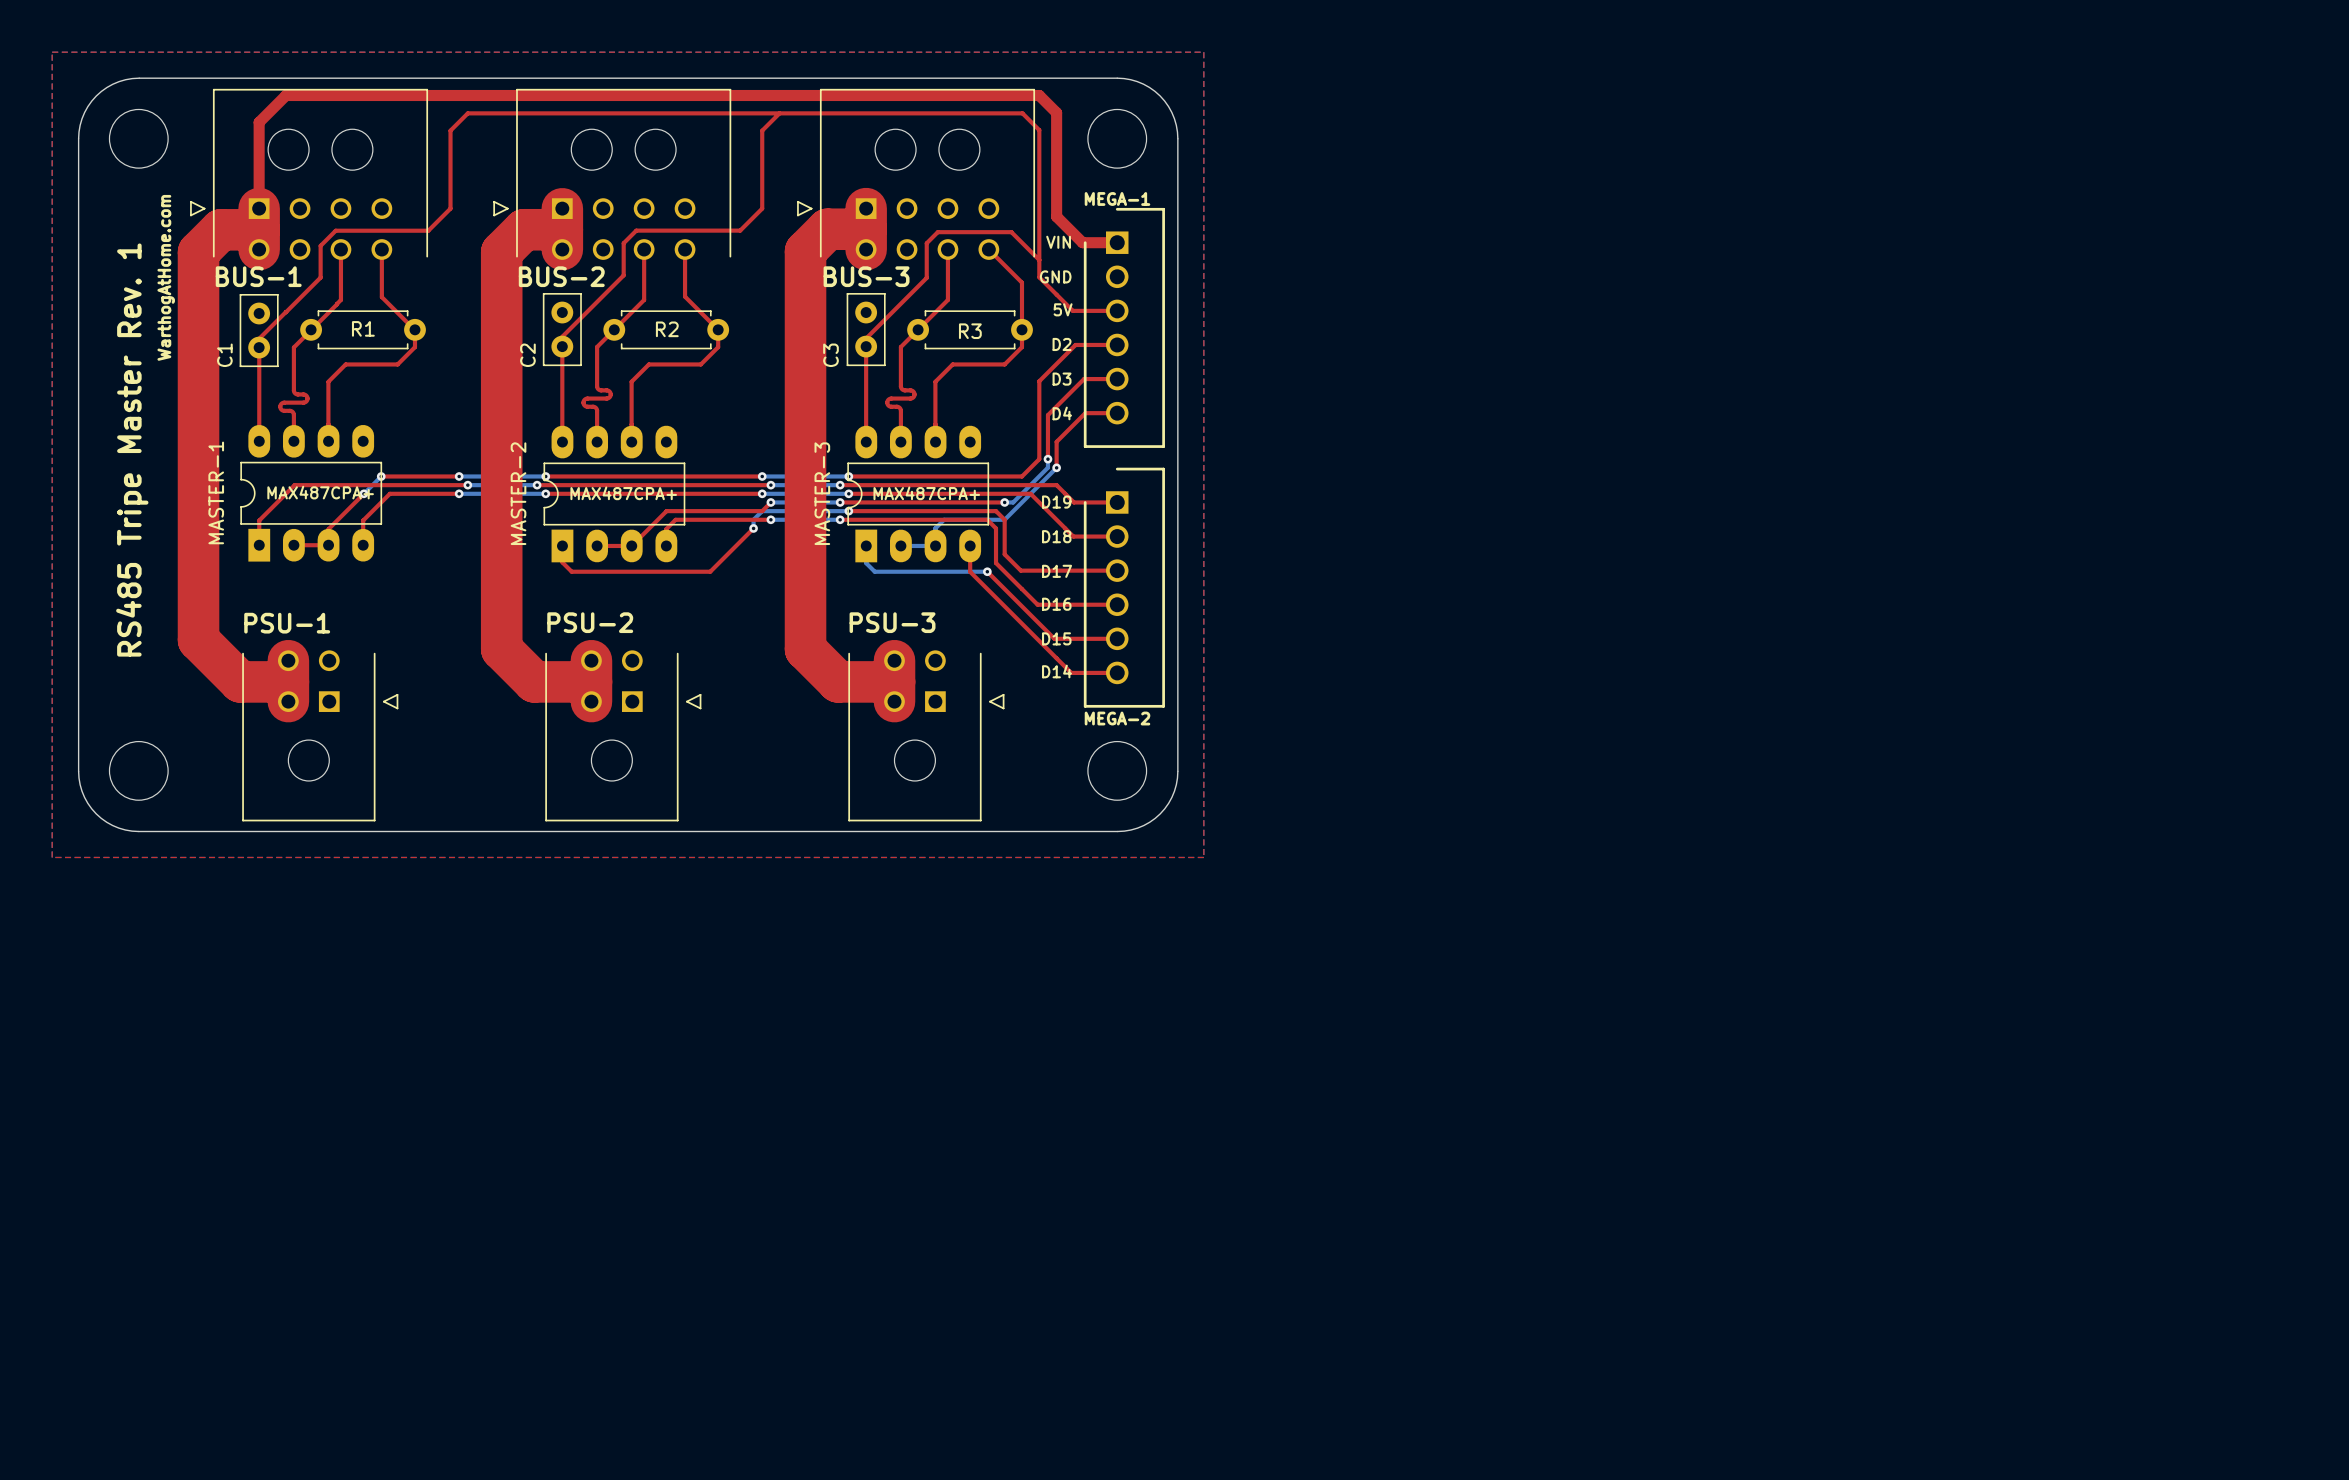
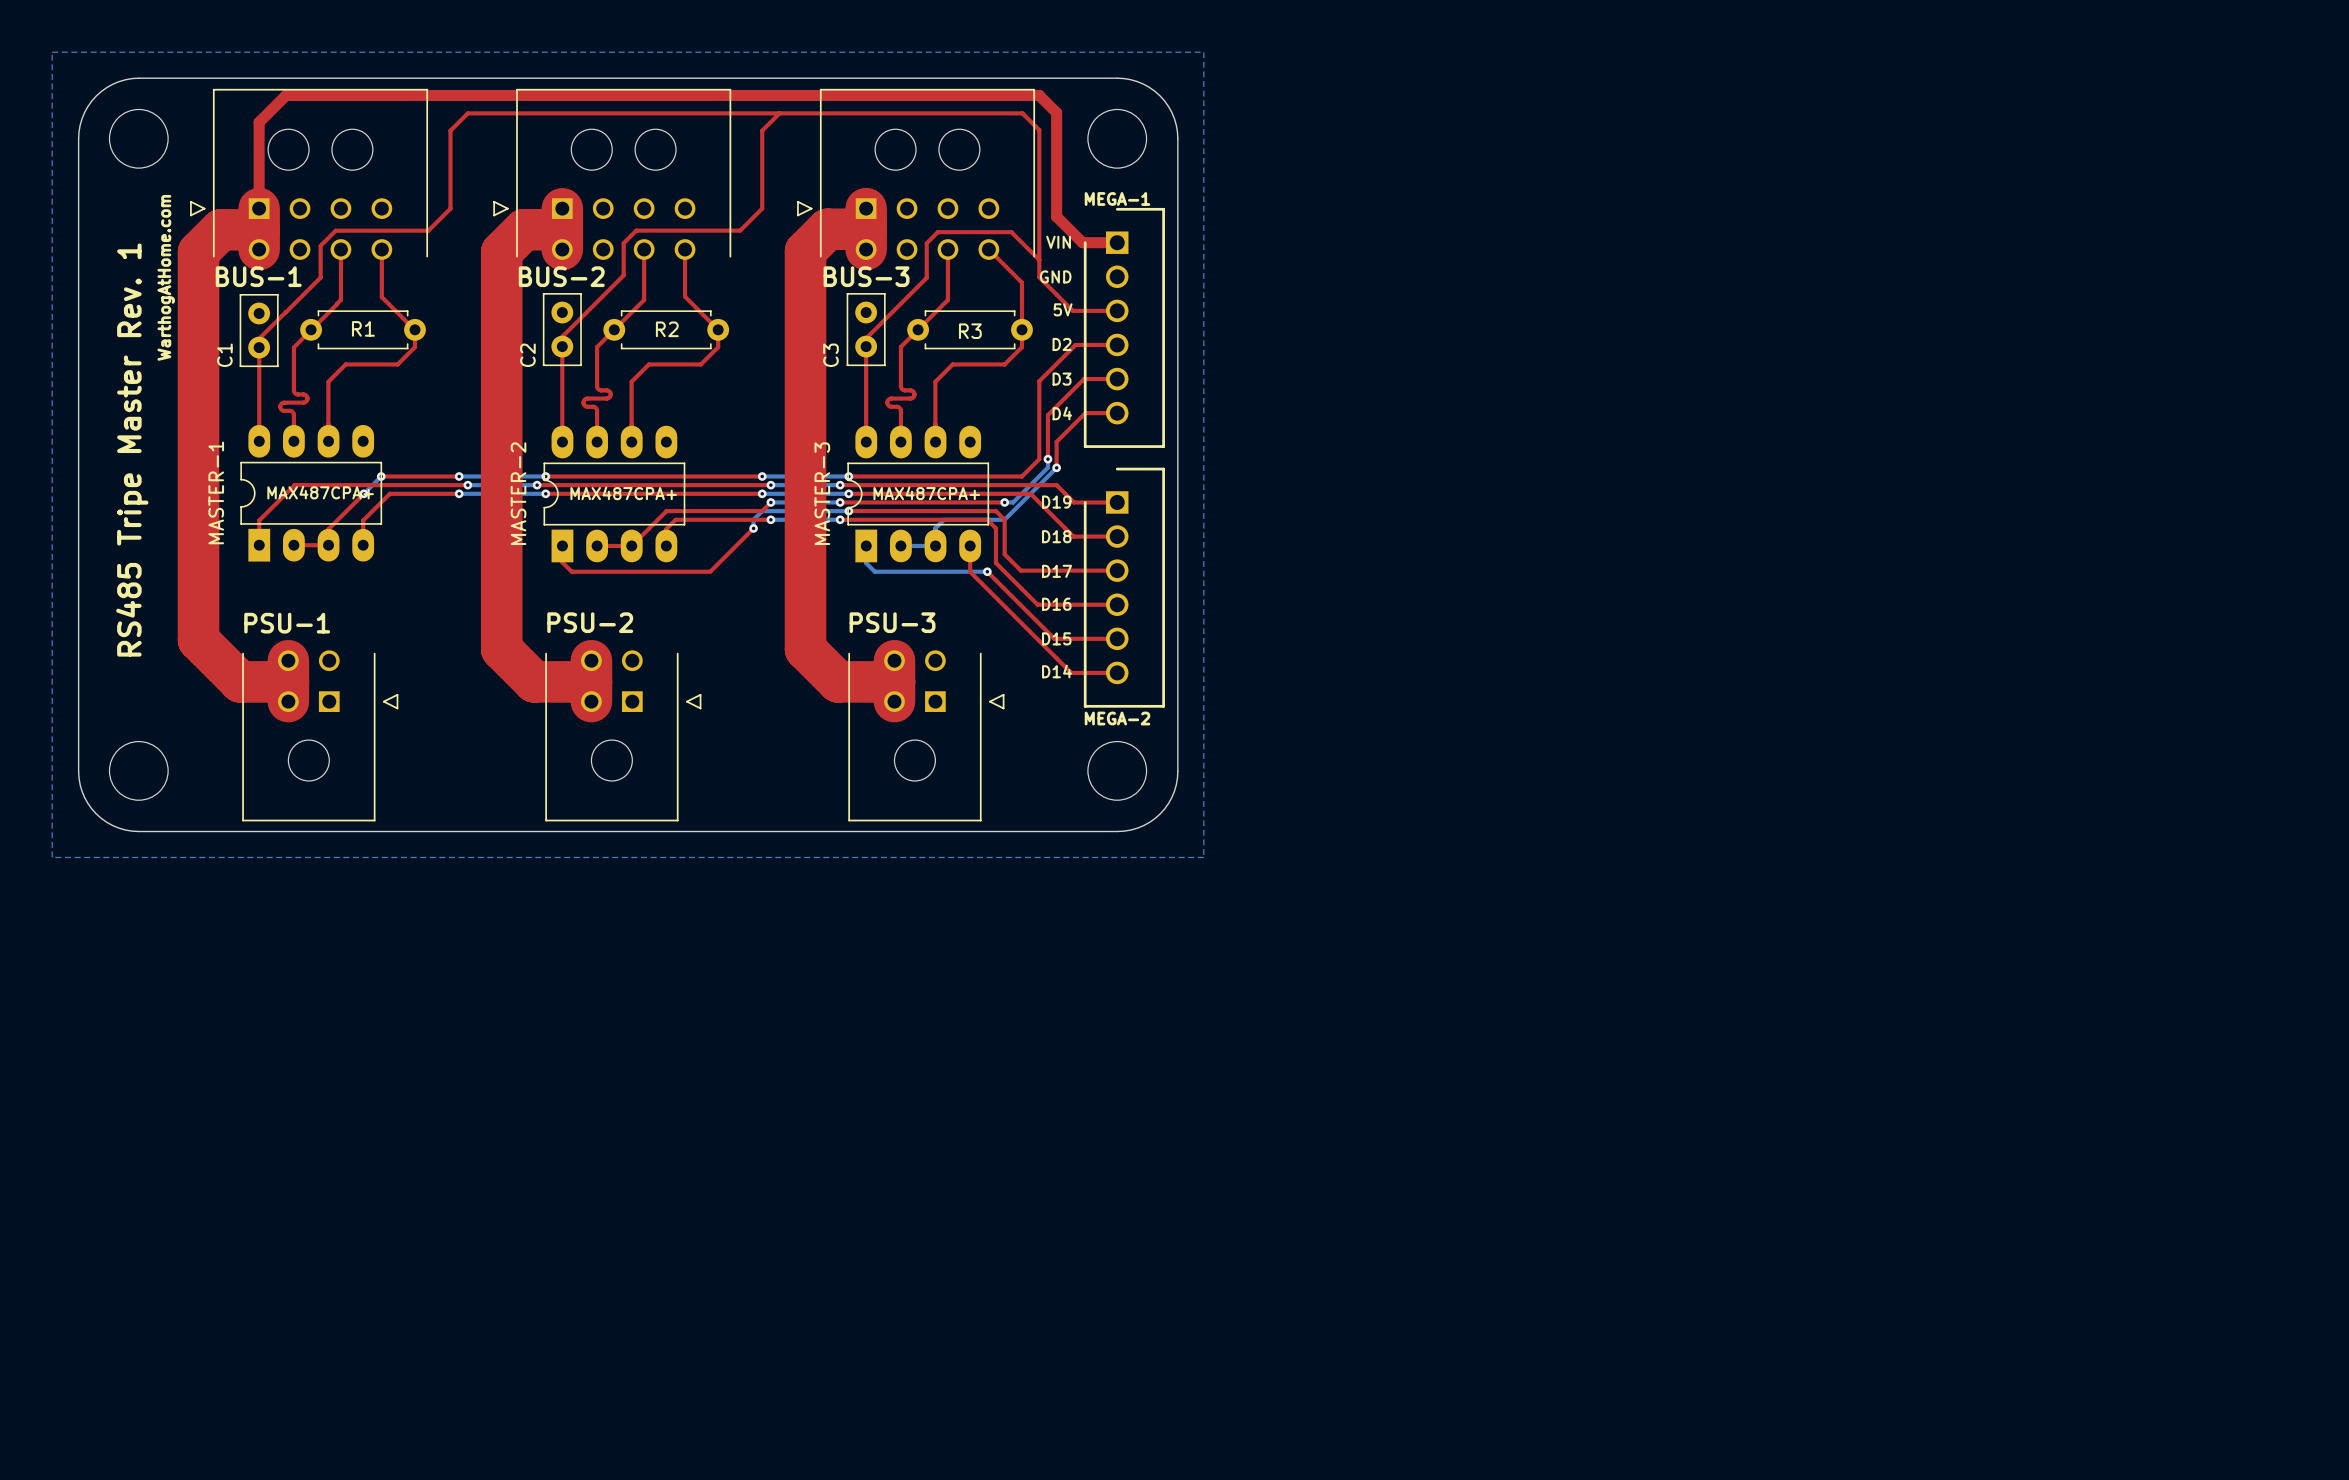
top zone outline: (52, 52) (52, 857) (1203, 857) (1203, 52) (52, 52) -> none

